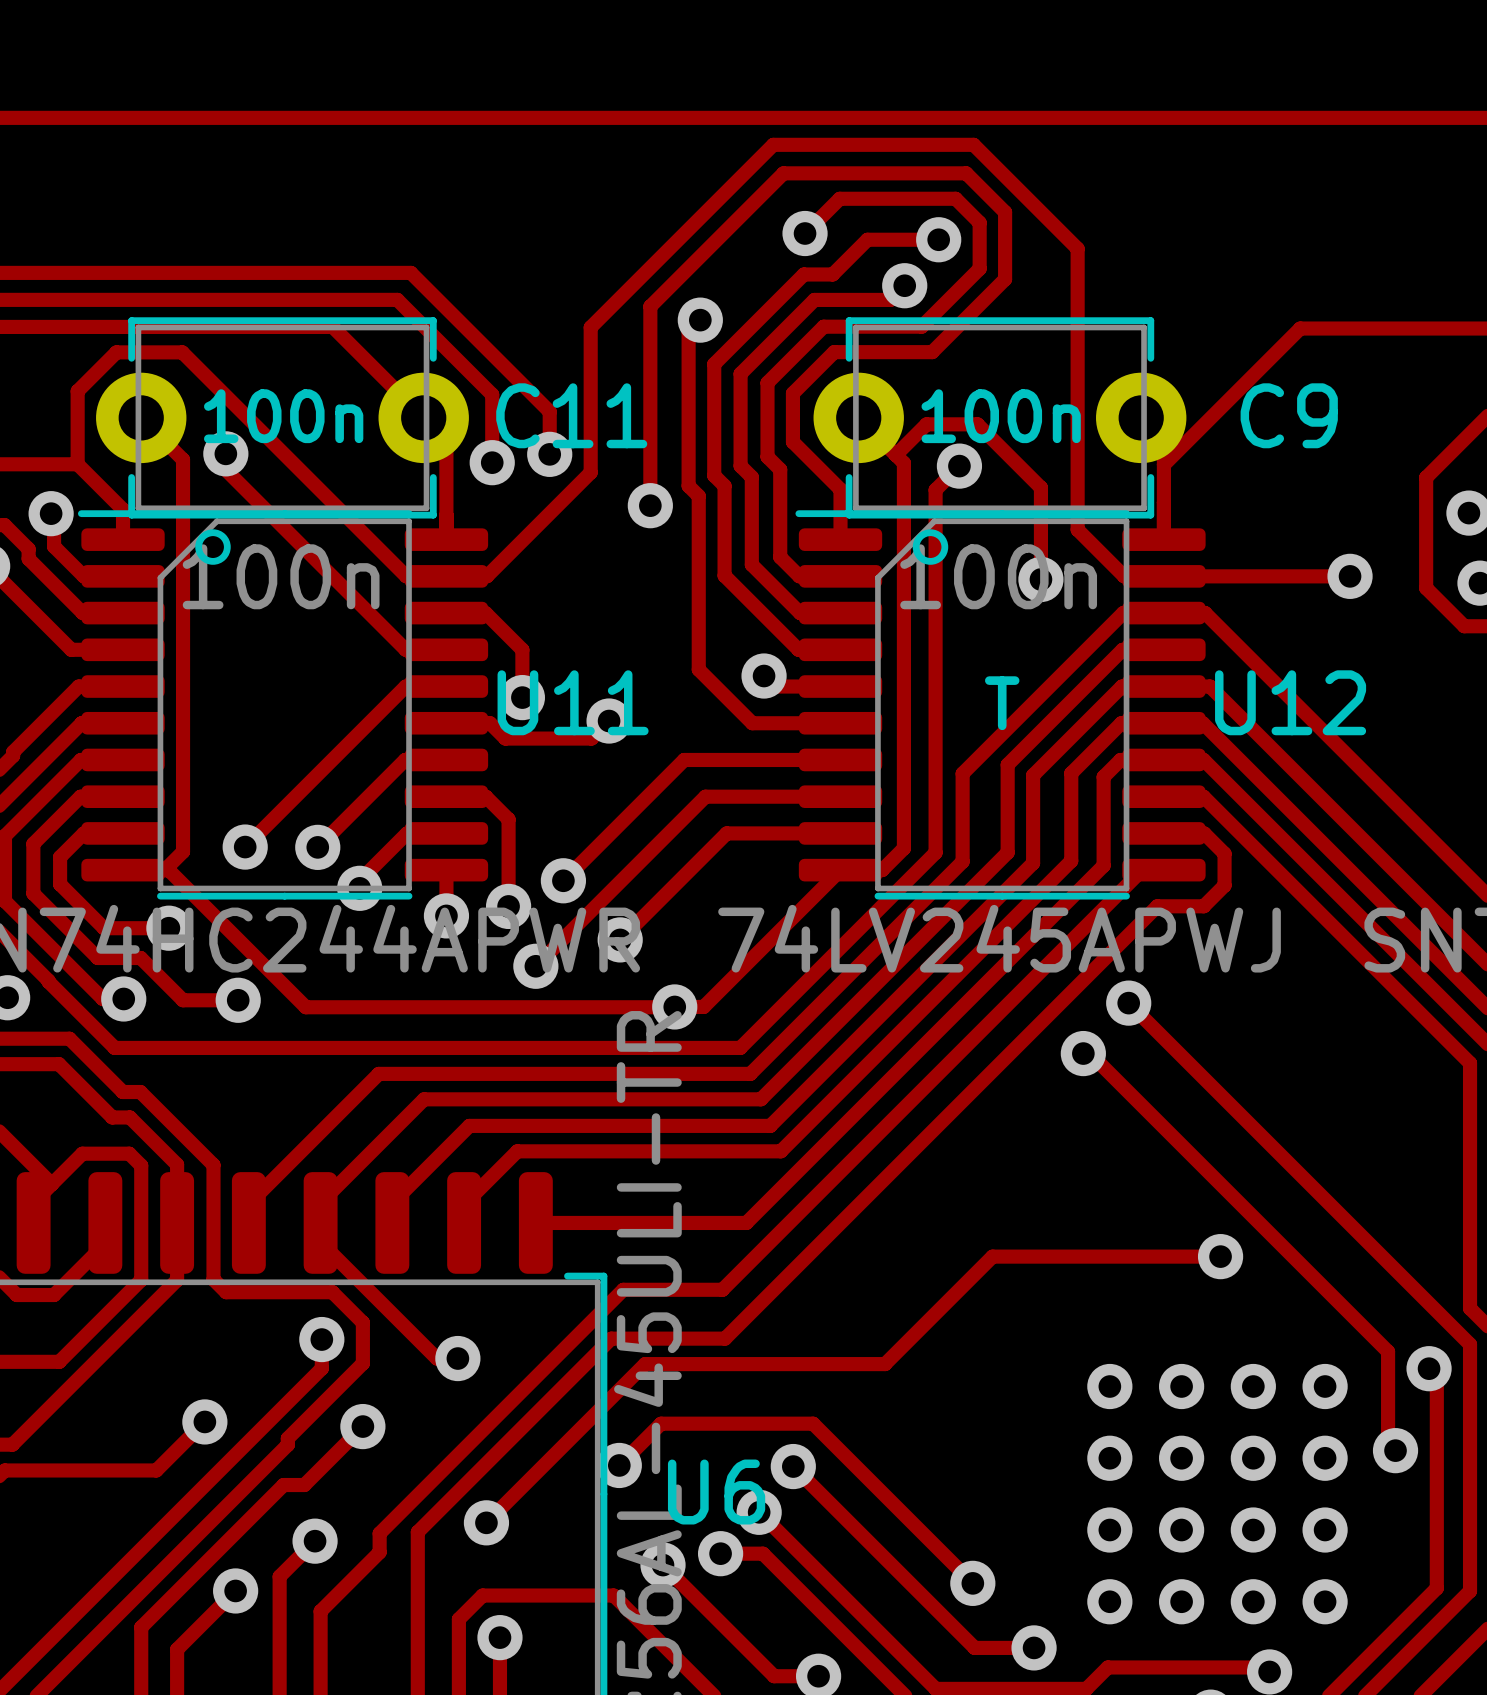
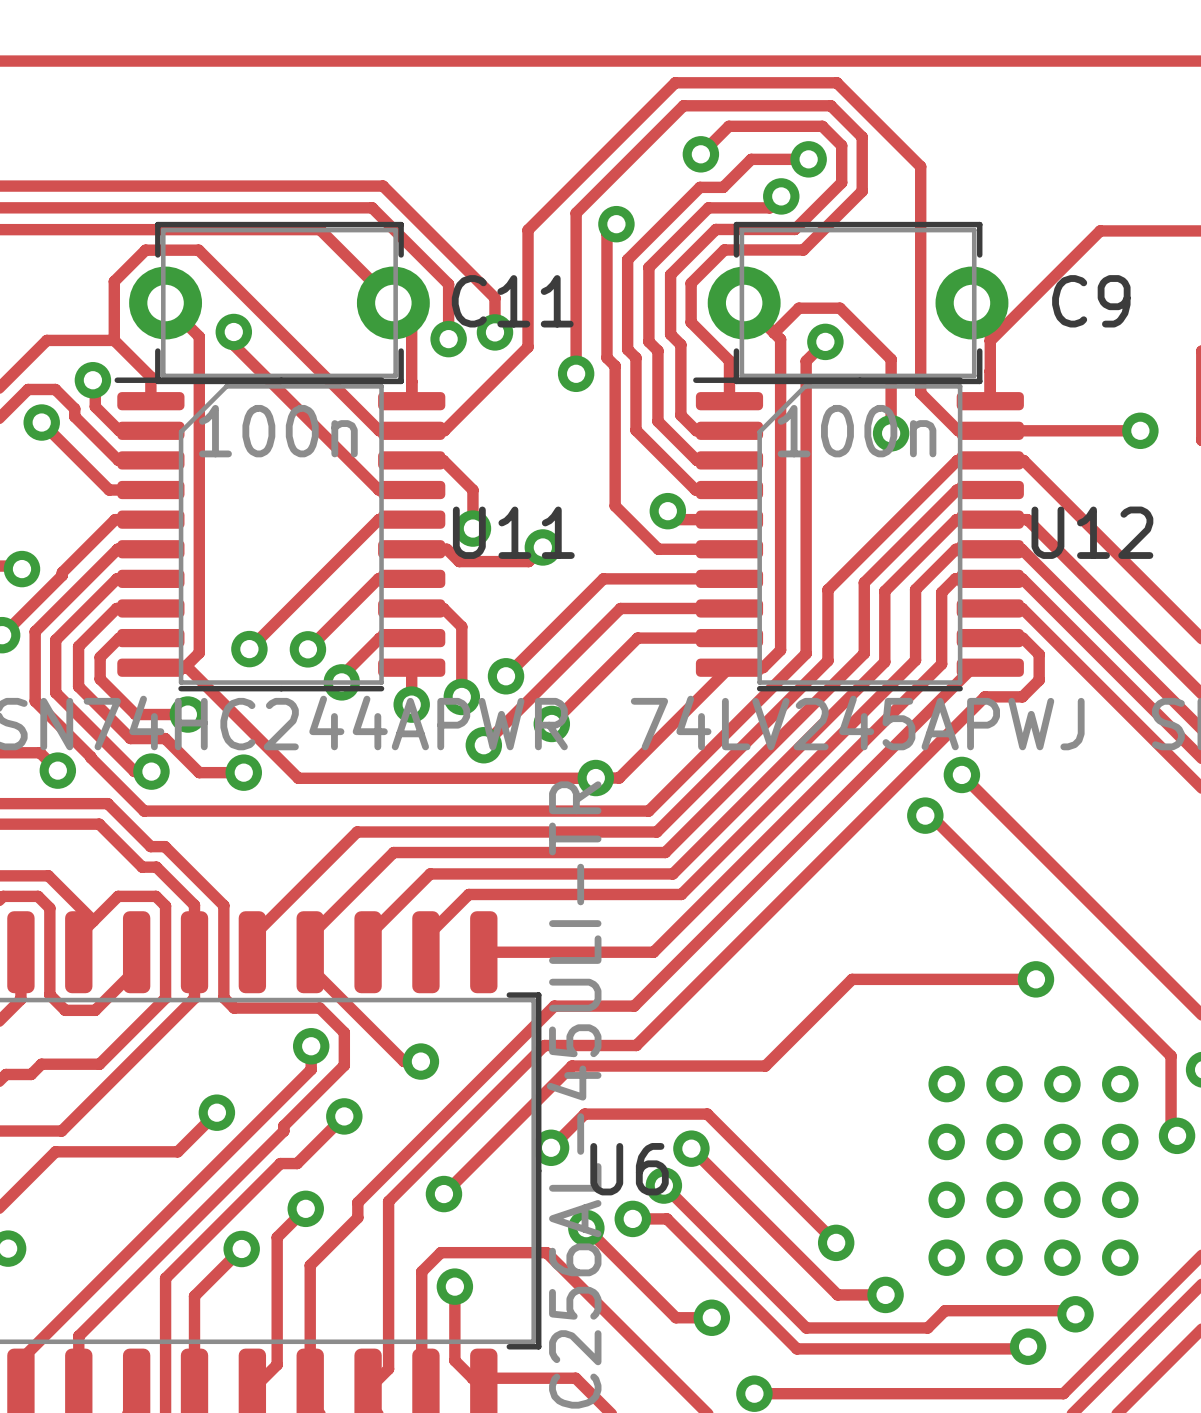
text: 100n (283, 416) -> none
text: 100n (1001, 416) -> none
drawing: [195, 529, 231, 565] -> none
drawing: [912, 529, 949, 565] -> none
text: T (1002, 703) -> none

